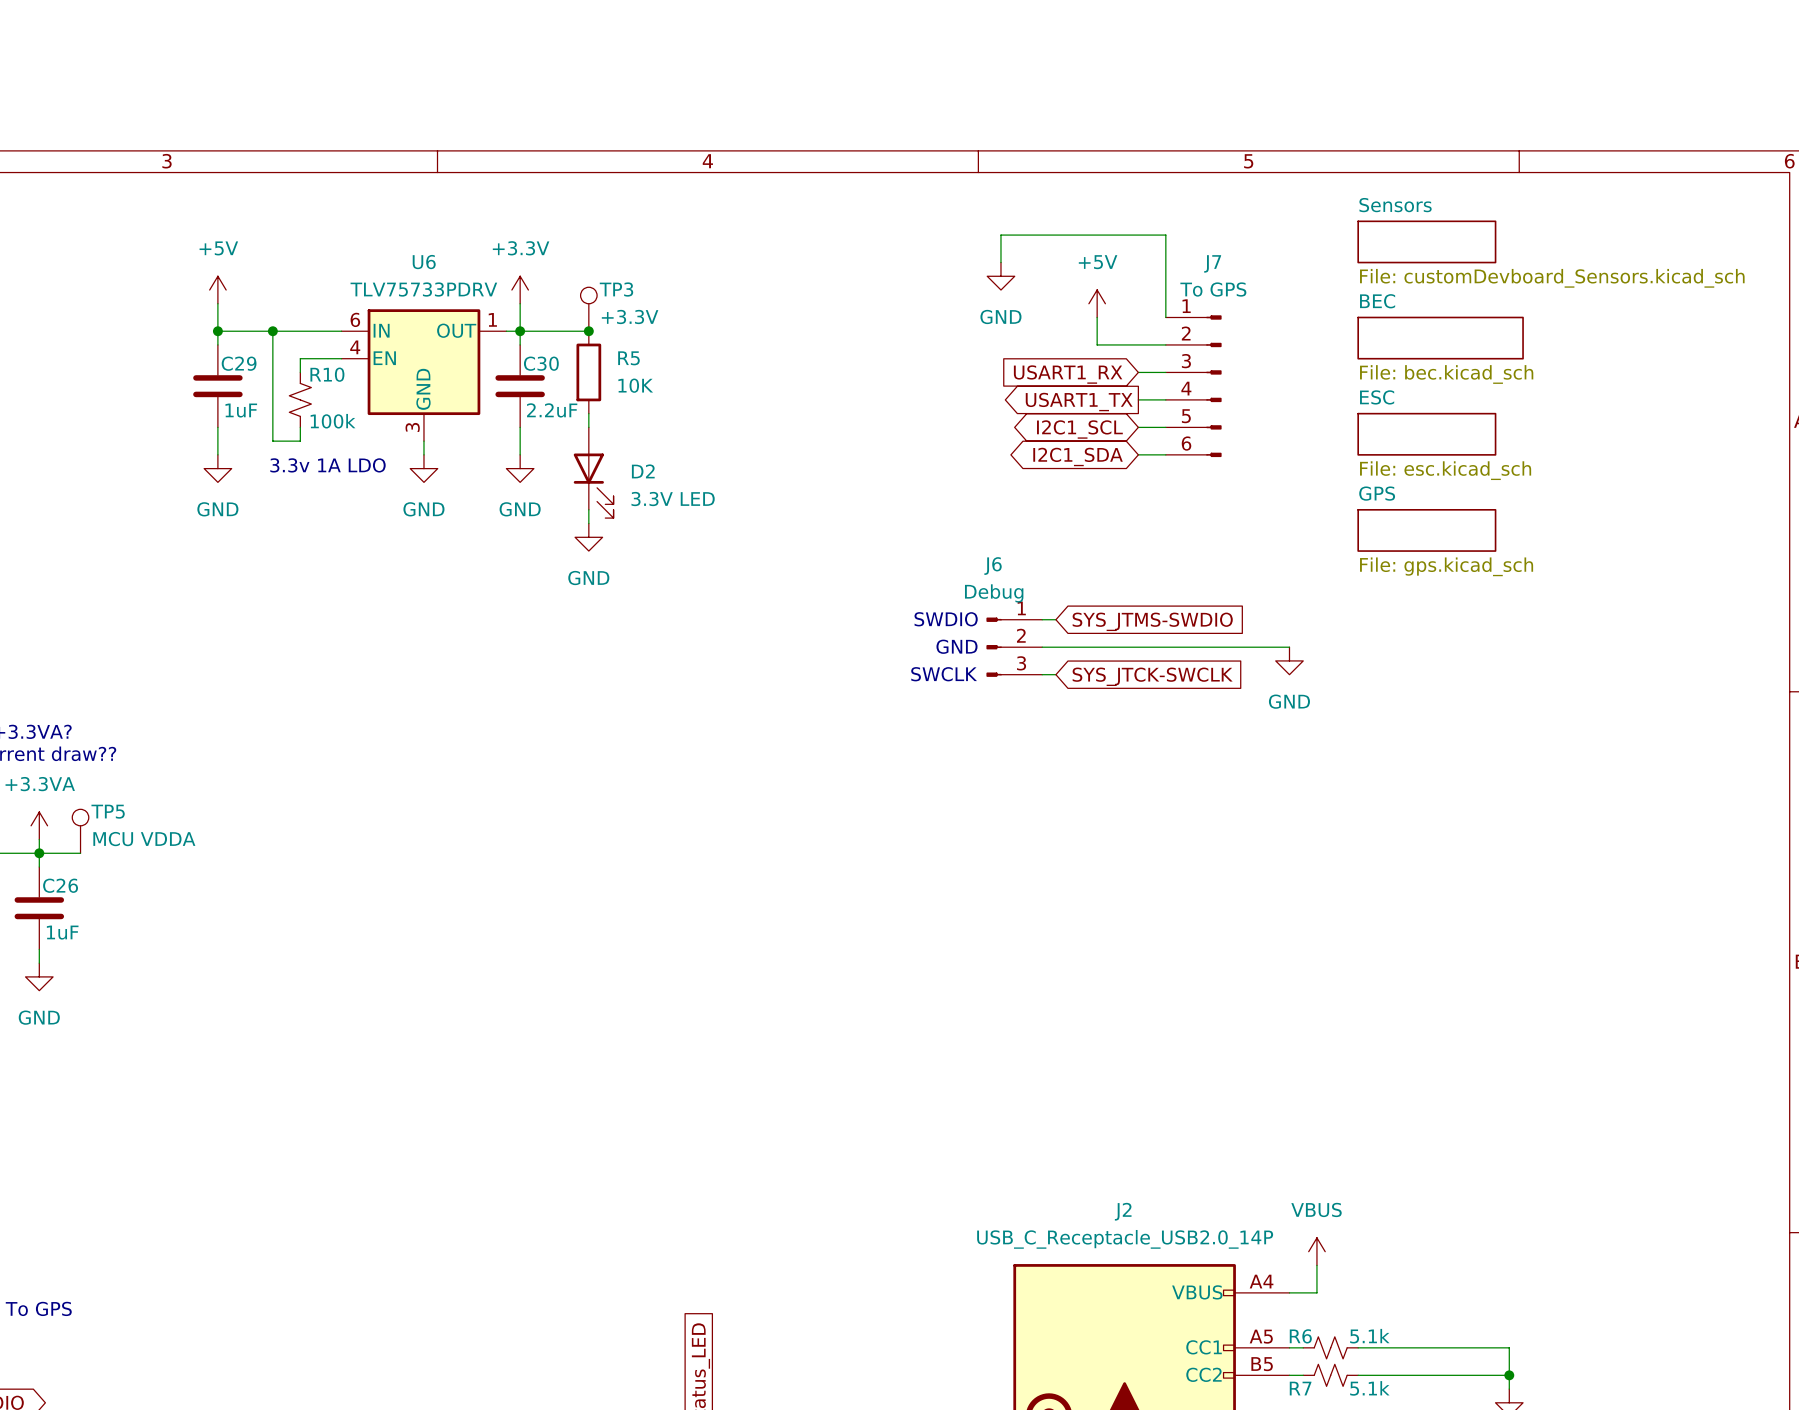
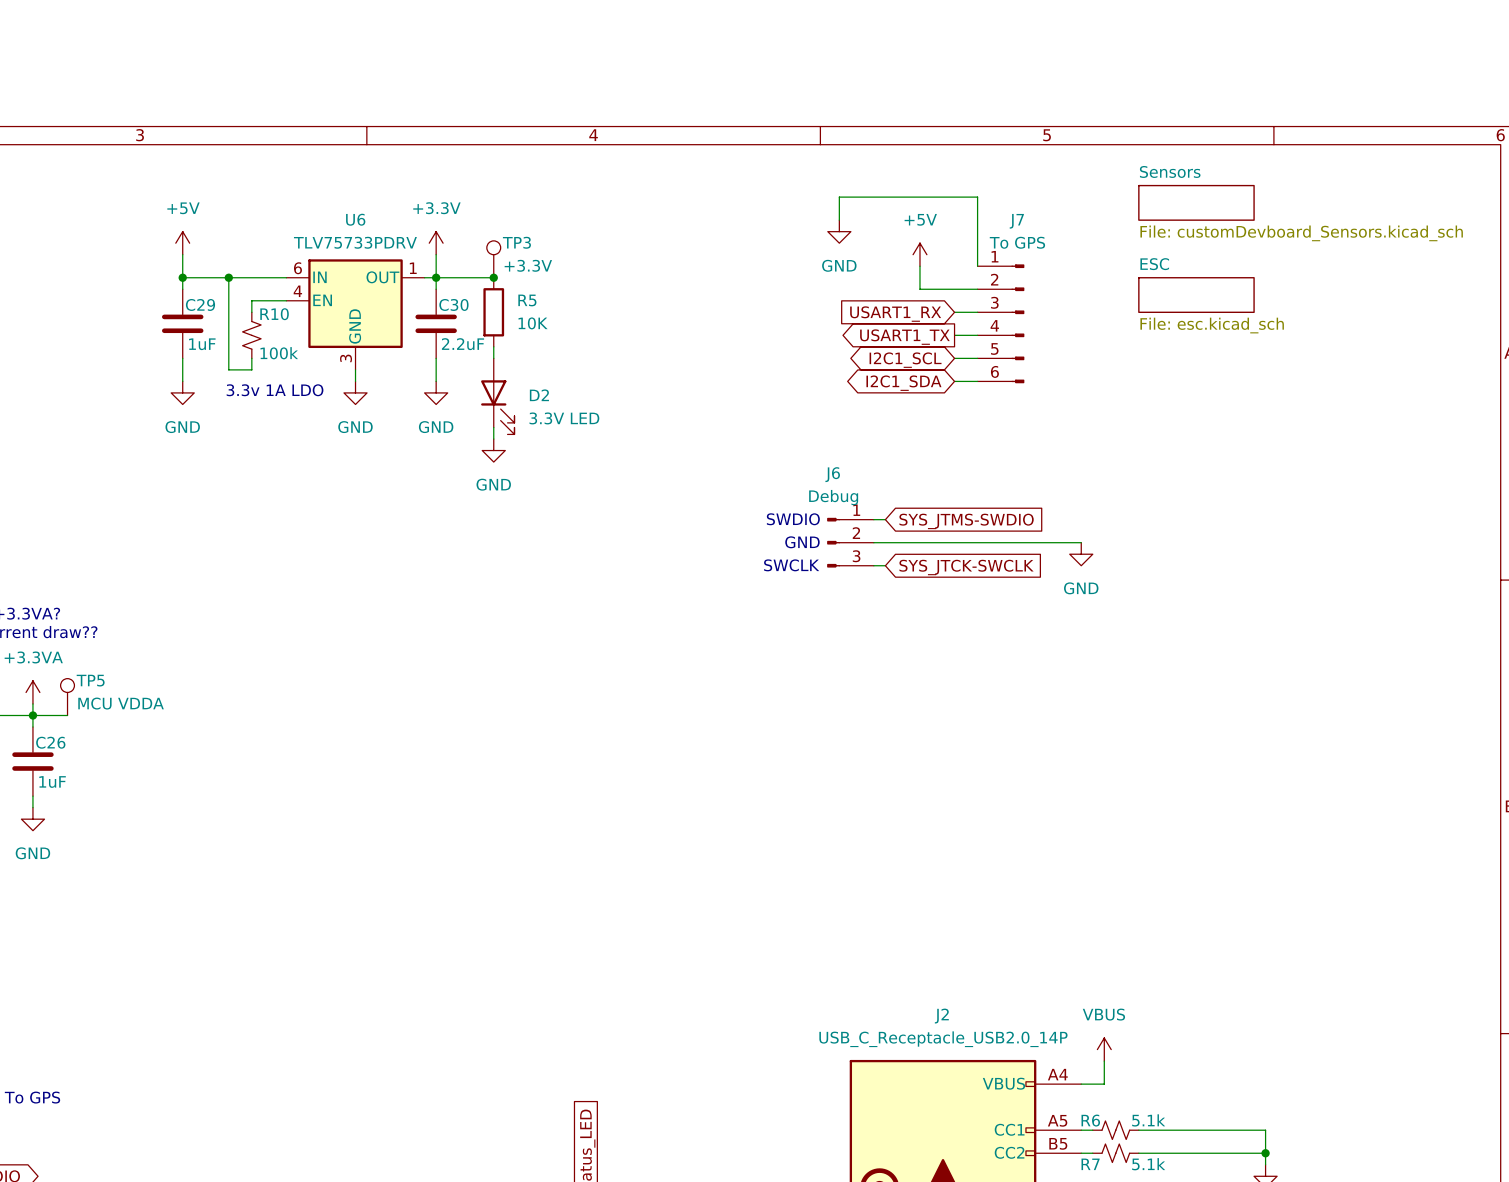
sheet BEC: File: bec.kicad_sch (1440, 338) -> none
sheet ESC position: (1426, 434) -> (1196, 295)
sheet GPS: File: gps.kicad_sch (1426, 530) -> none

